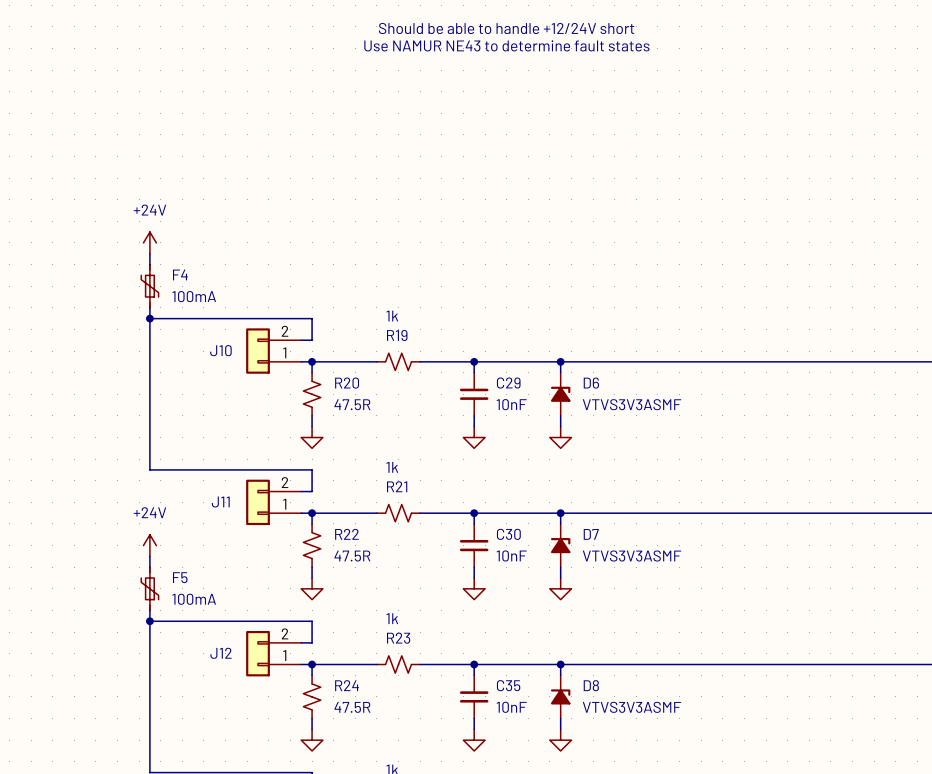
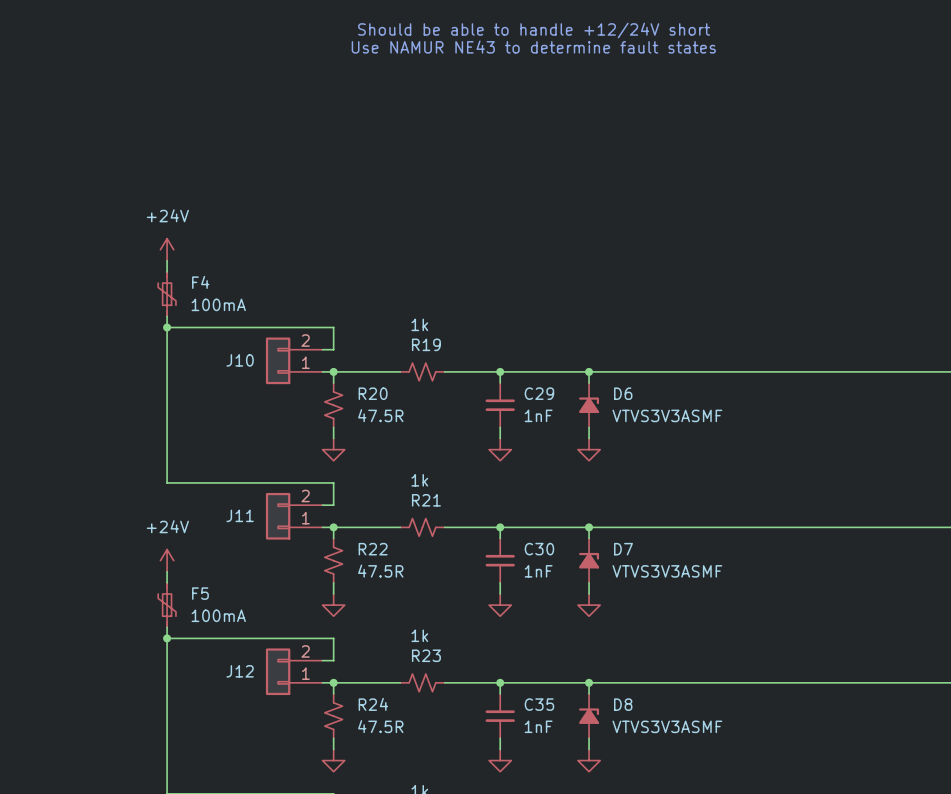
C29 value: 10nF (511, 404) -> 1nF (538, 415)
C30 value: 10nF (511, 555) -> 1nF (538, 571)
C35 value: 10nF (511, 707) -> 1nF (538, 726)

